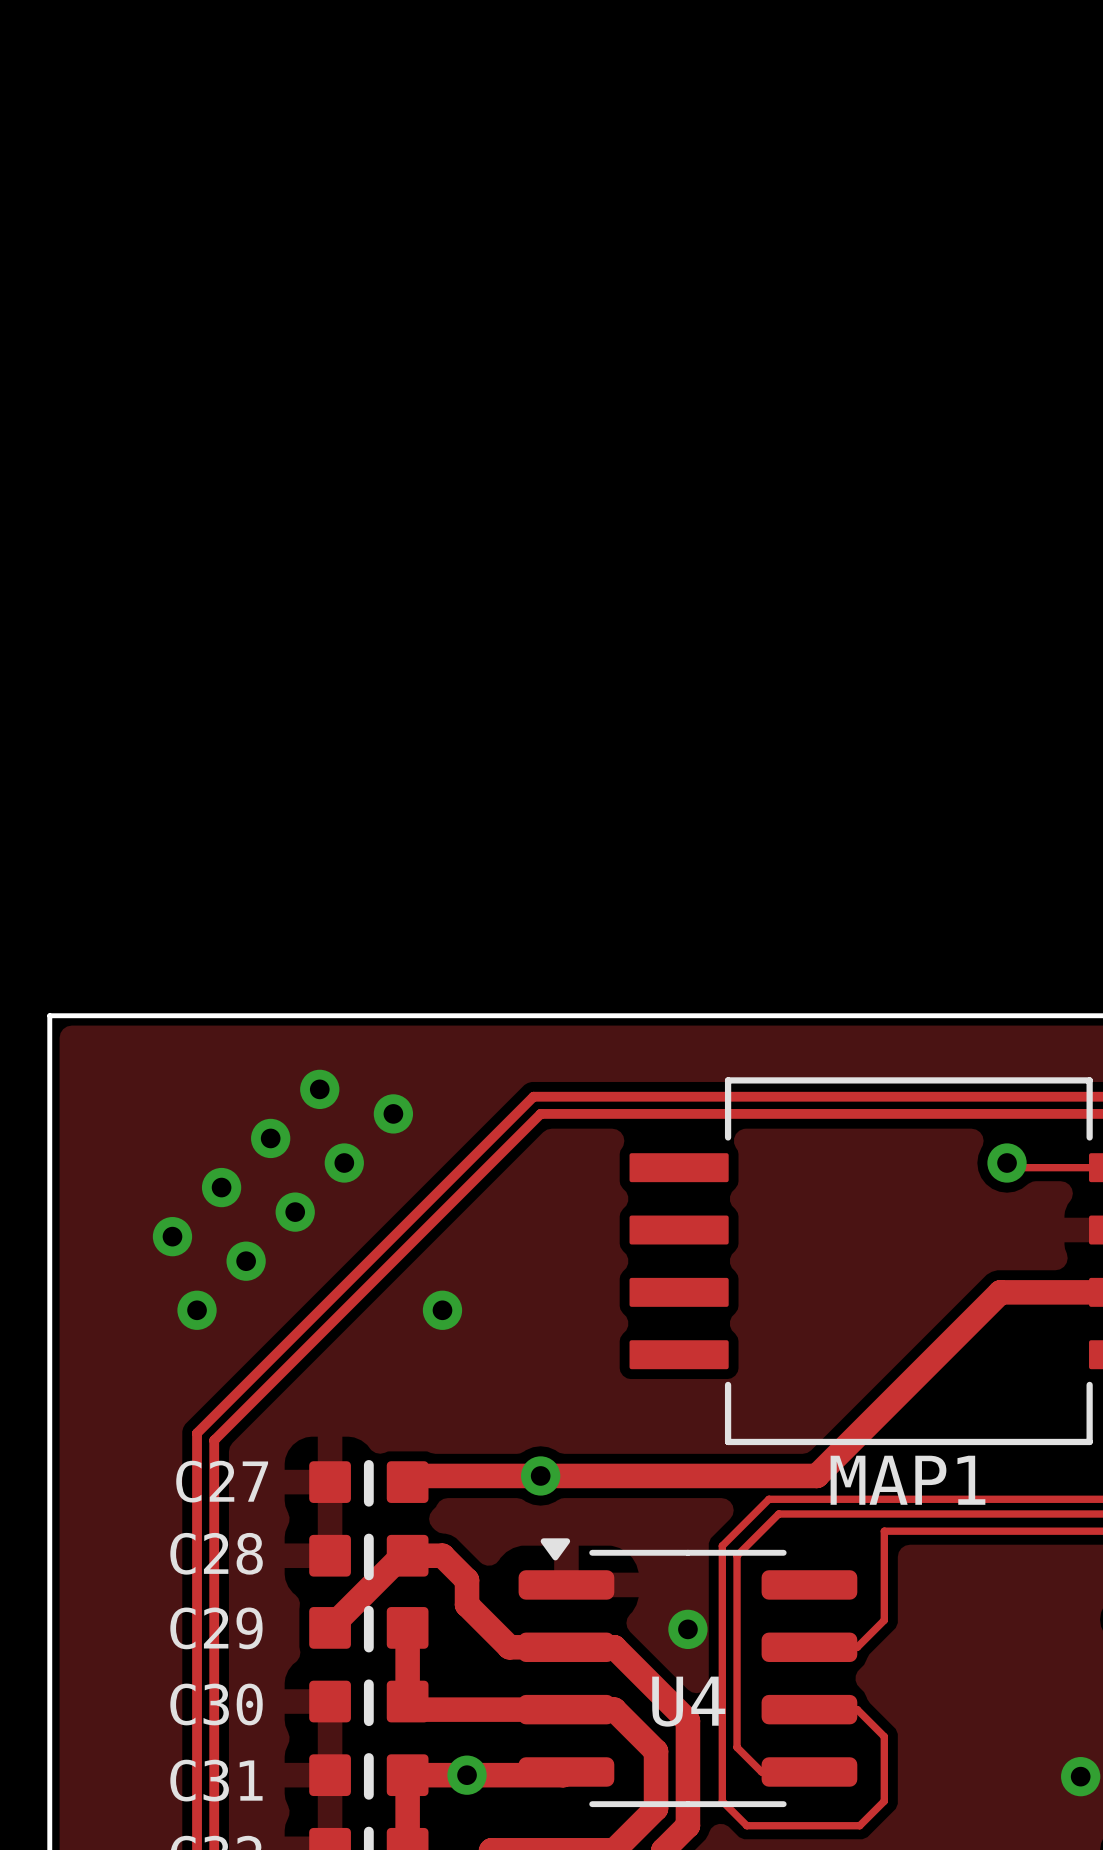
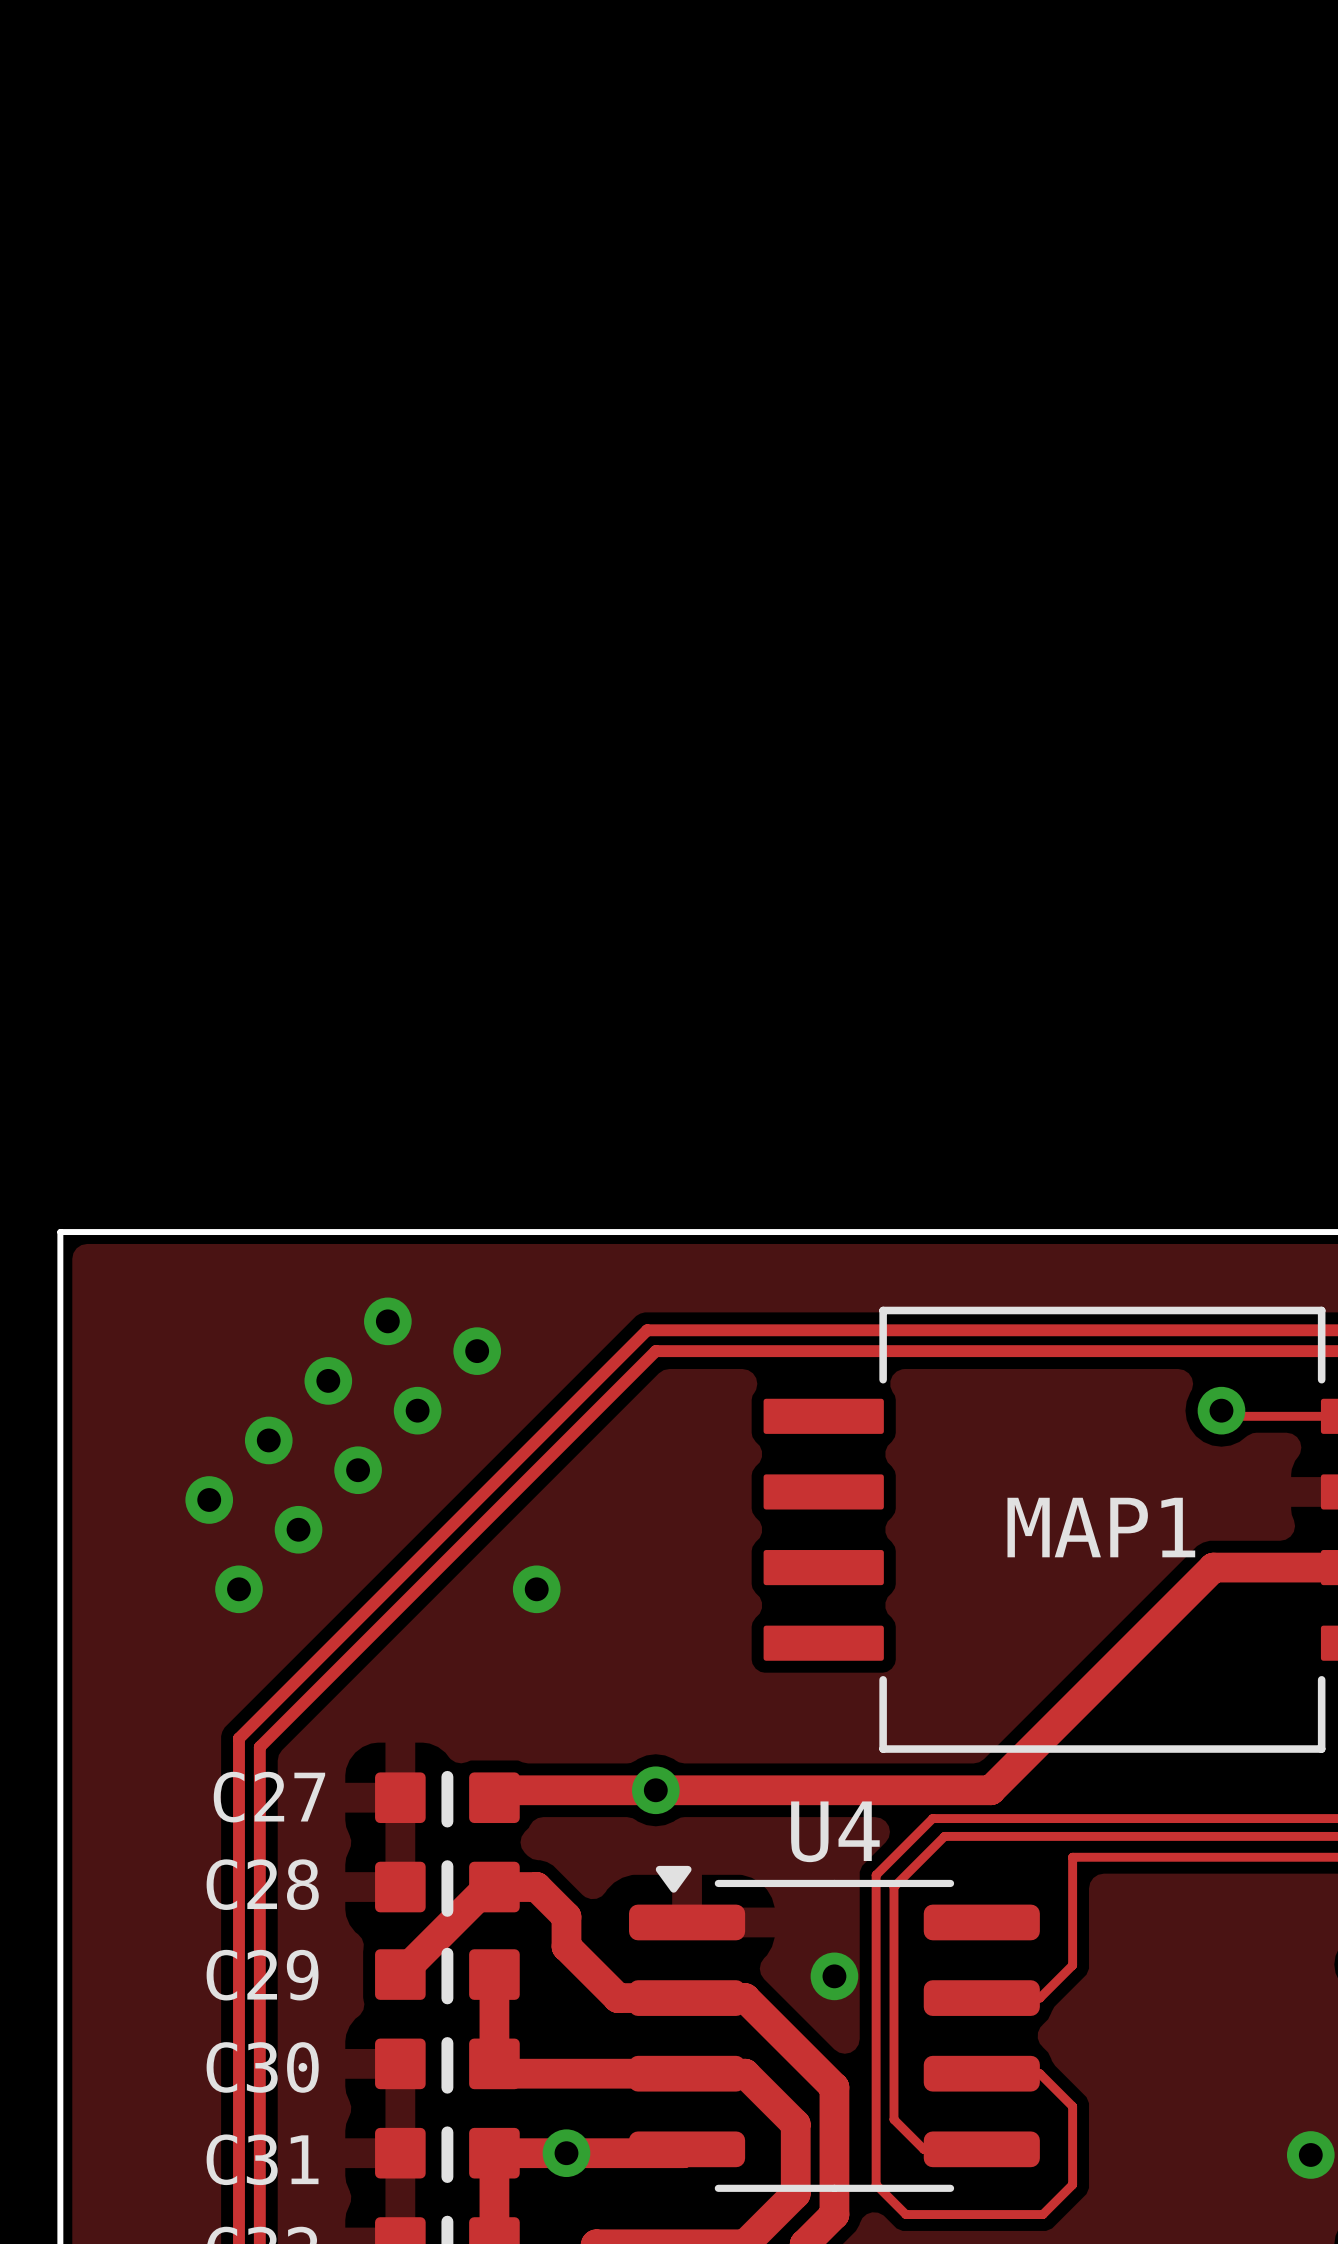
MAP1 name position: MAP1 (907, 1480) -> MAP1 (1101, 1527)
U4 name position: U4 (688, 1701) -> U4 (835, 1831)

